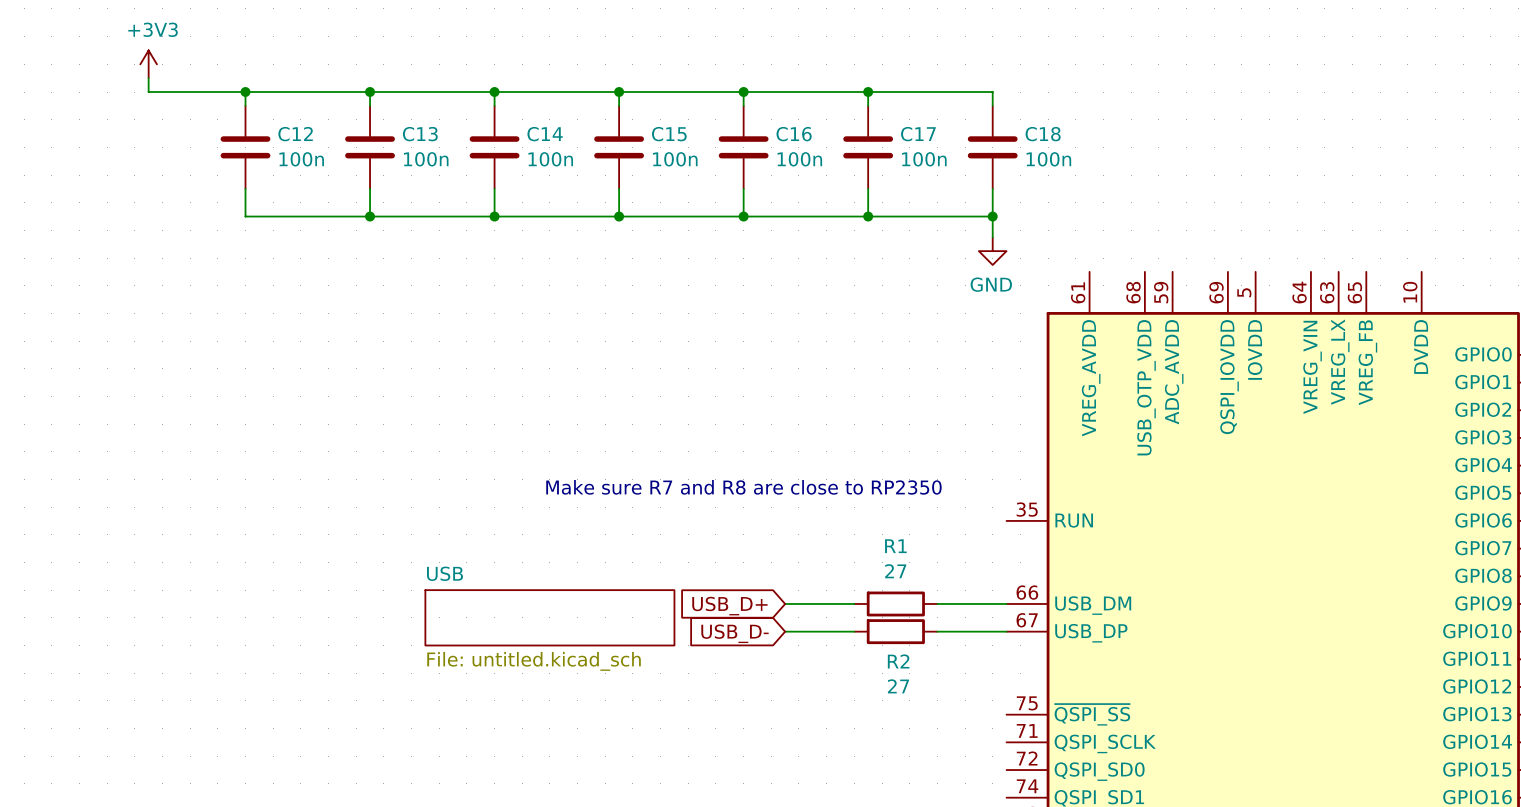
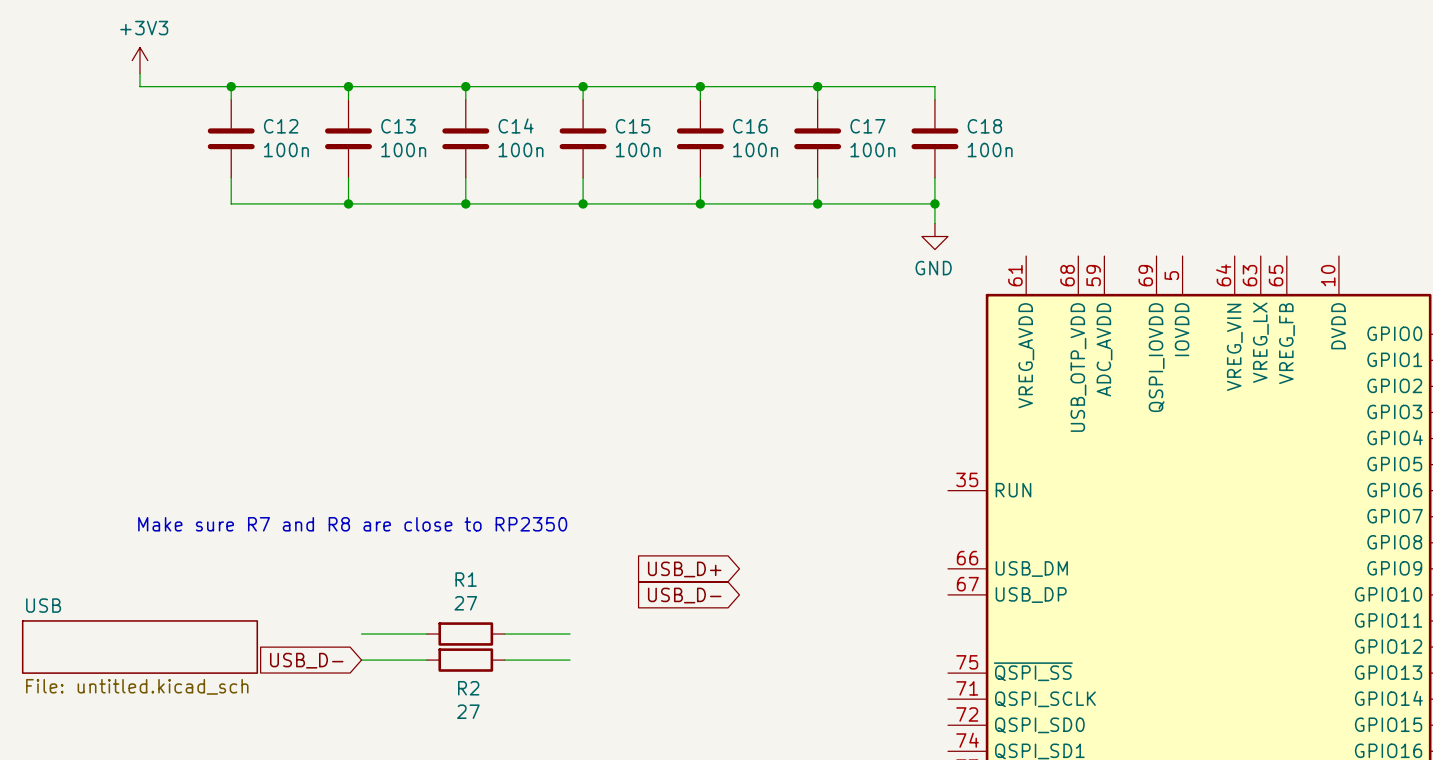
text: Make sure R7 and R8 are close to RP2350 (743, 487) -> none
text: none -> Make sure R7 and R8 are close to RP2350 (352, 524)
wire: (785, 603) (854, 603) -> (504, 634) (570, 634)
R1 position: (895, 603) -> (465, 634)
wire: (937, 603) (1006, 603) -> none
sheet USB: File: untitled.kicad_sch (549, 617) -> none
wire: (785, 631) (854, 631) -> (504, 660) (570, 660)
R2 position: (895, 631) -> (465, 660)
wire: (937, 631) (1006, 631) -> none
wire: none -> (361, 634) (426, 634)
sheet USB: none -> File: untitled.kicad_sch (139, 647)
wire: none -> (361, 660) (426, 660)
global label: none -> USB_D- (306, 660)

